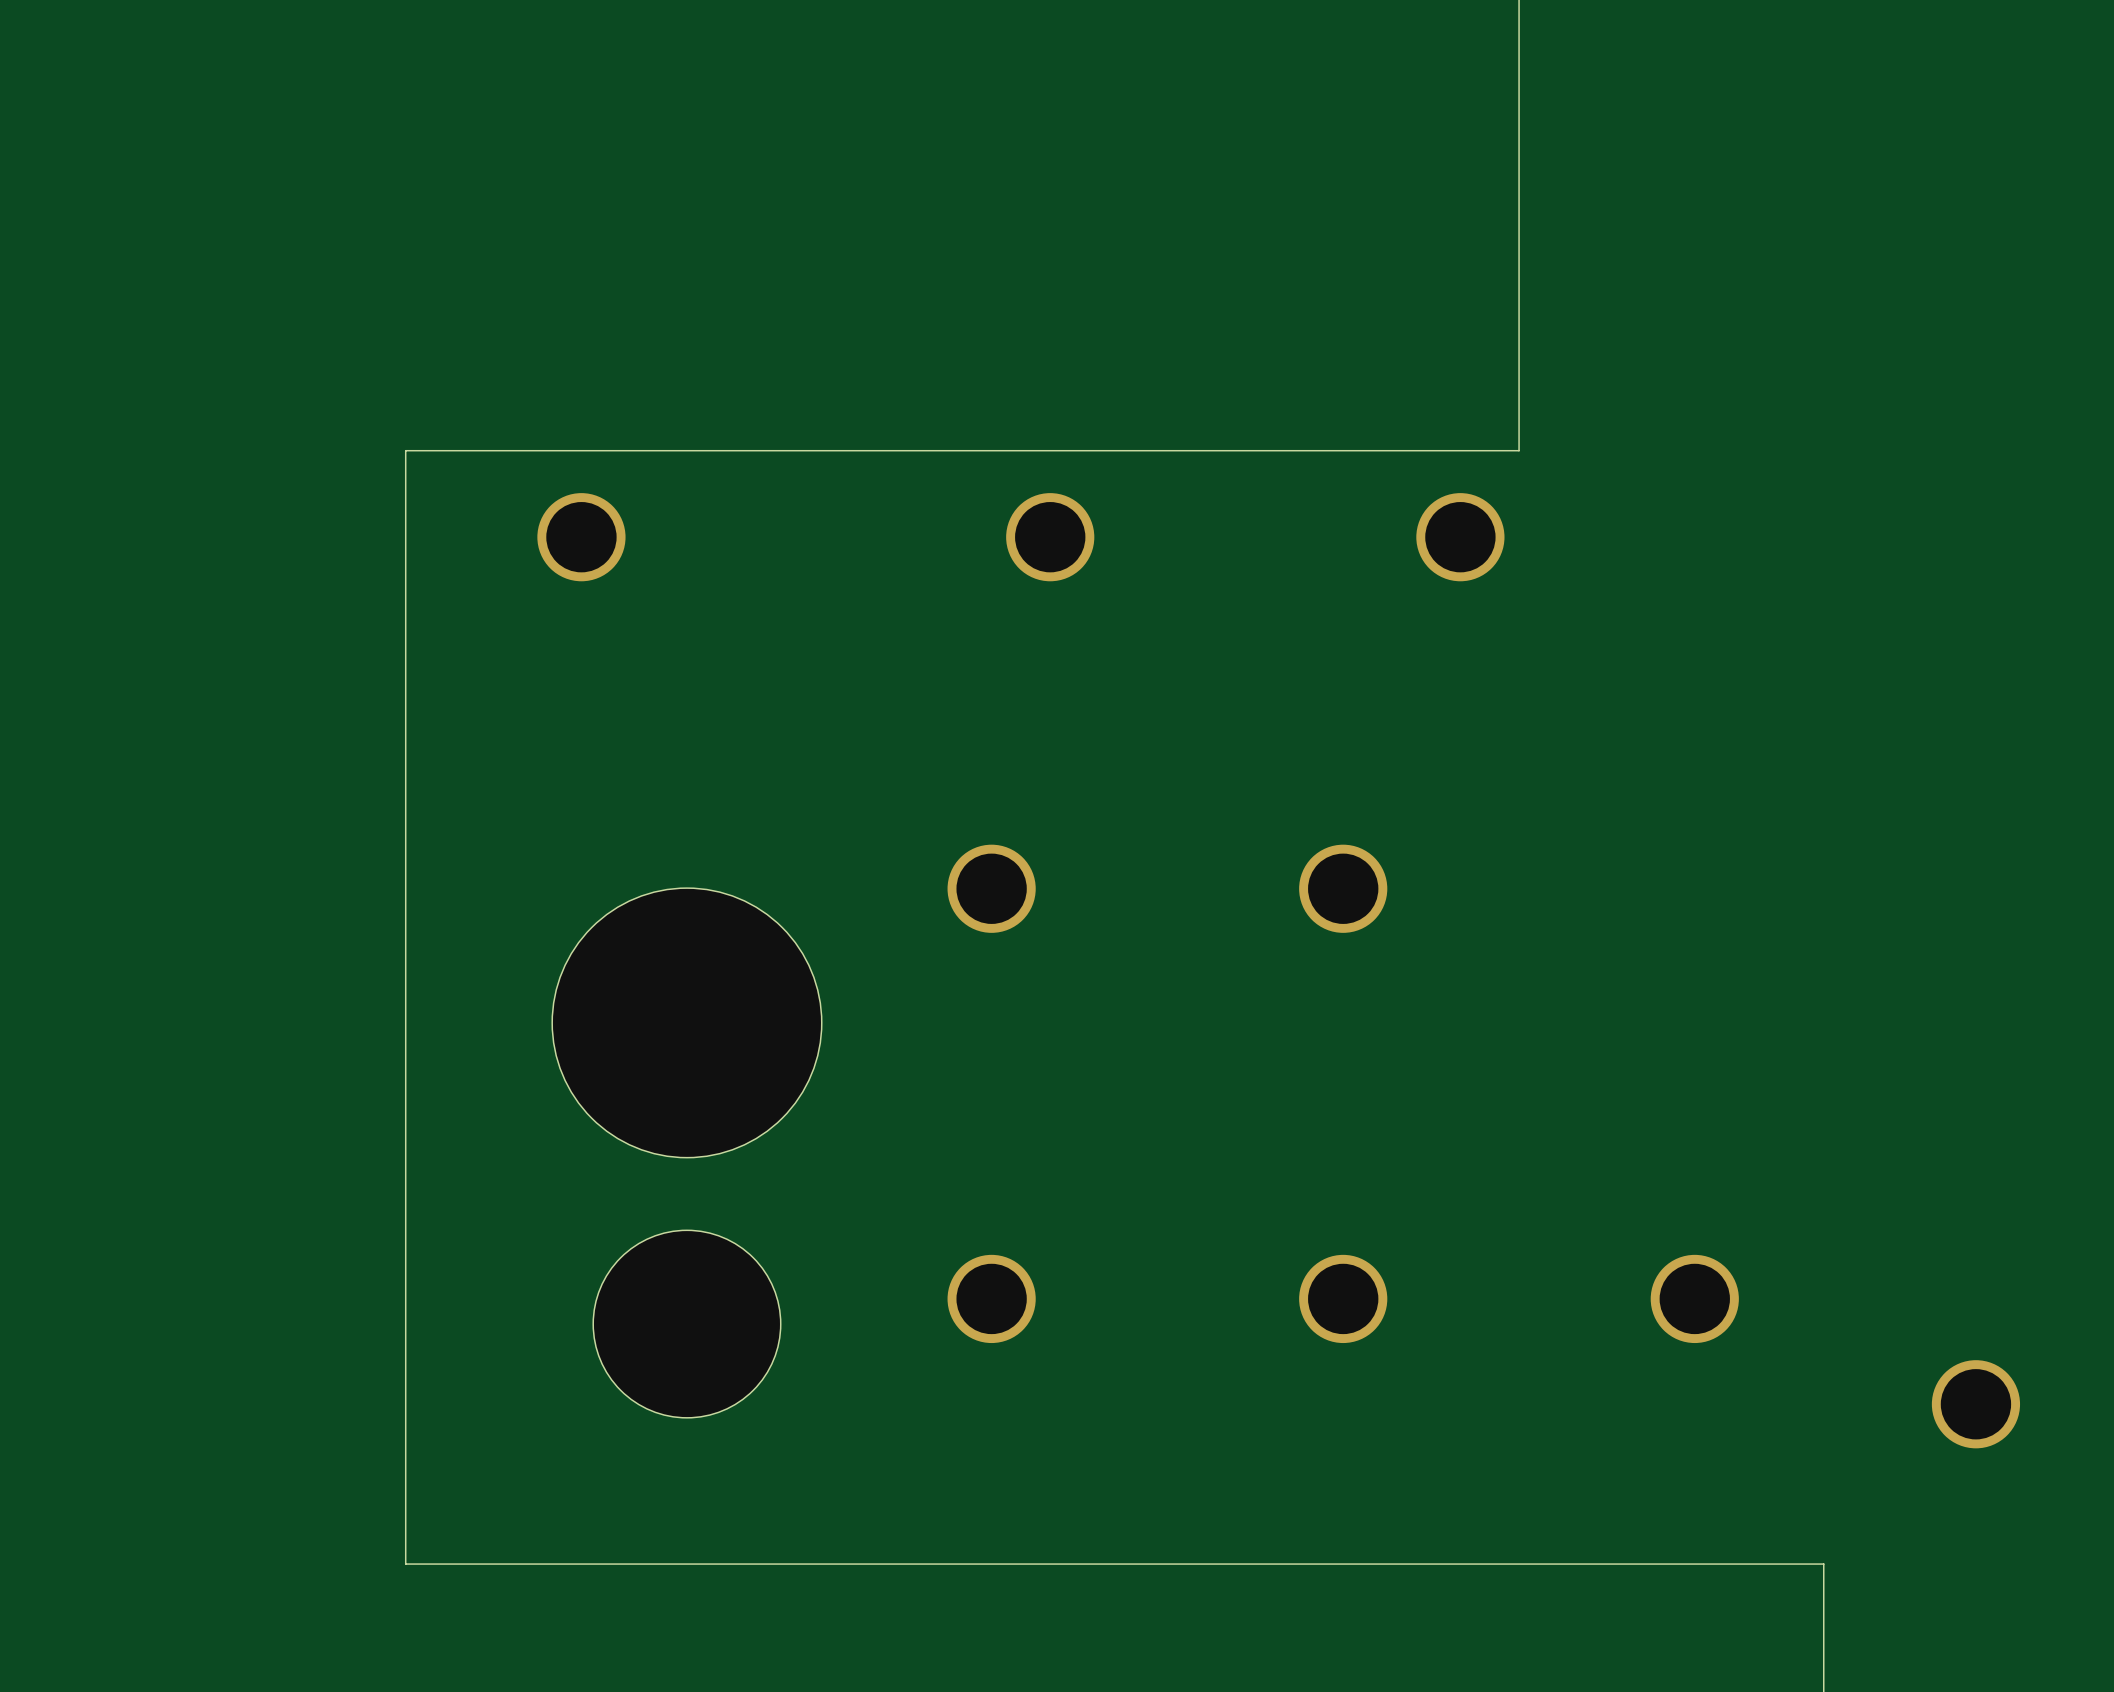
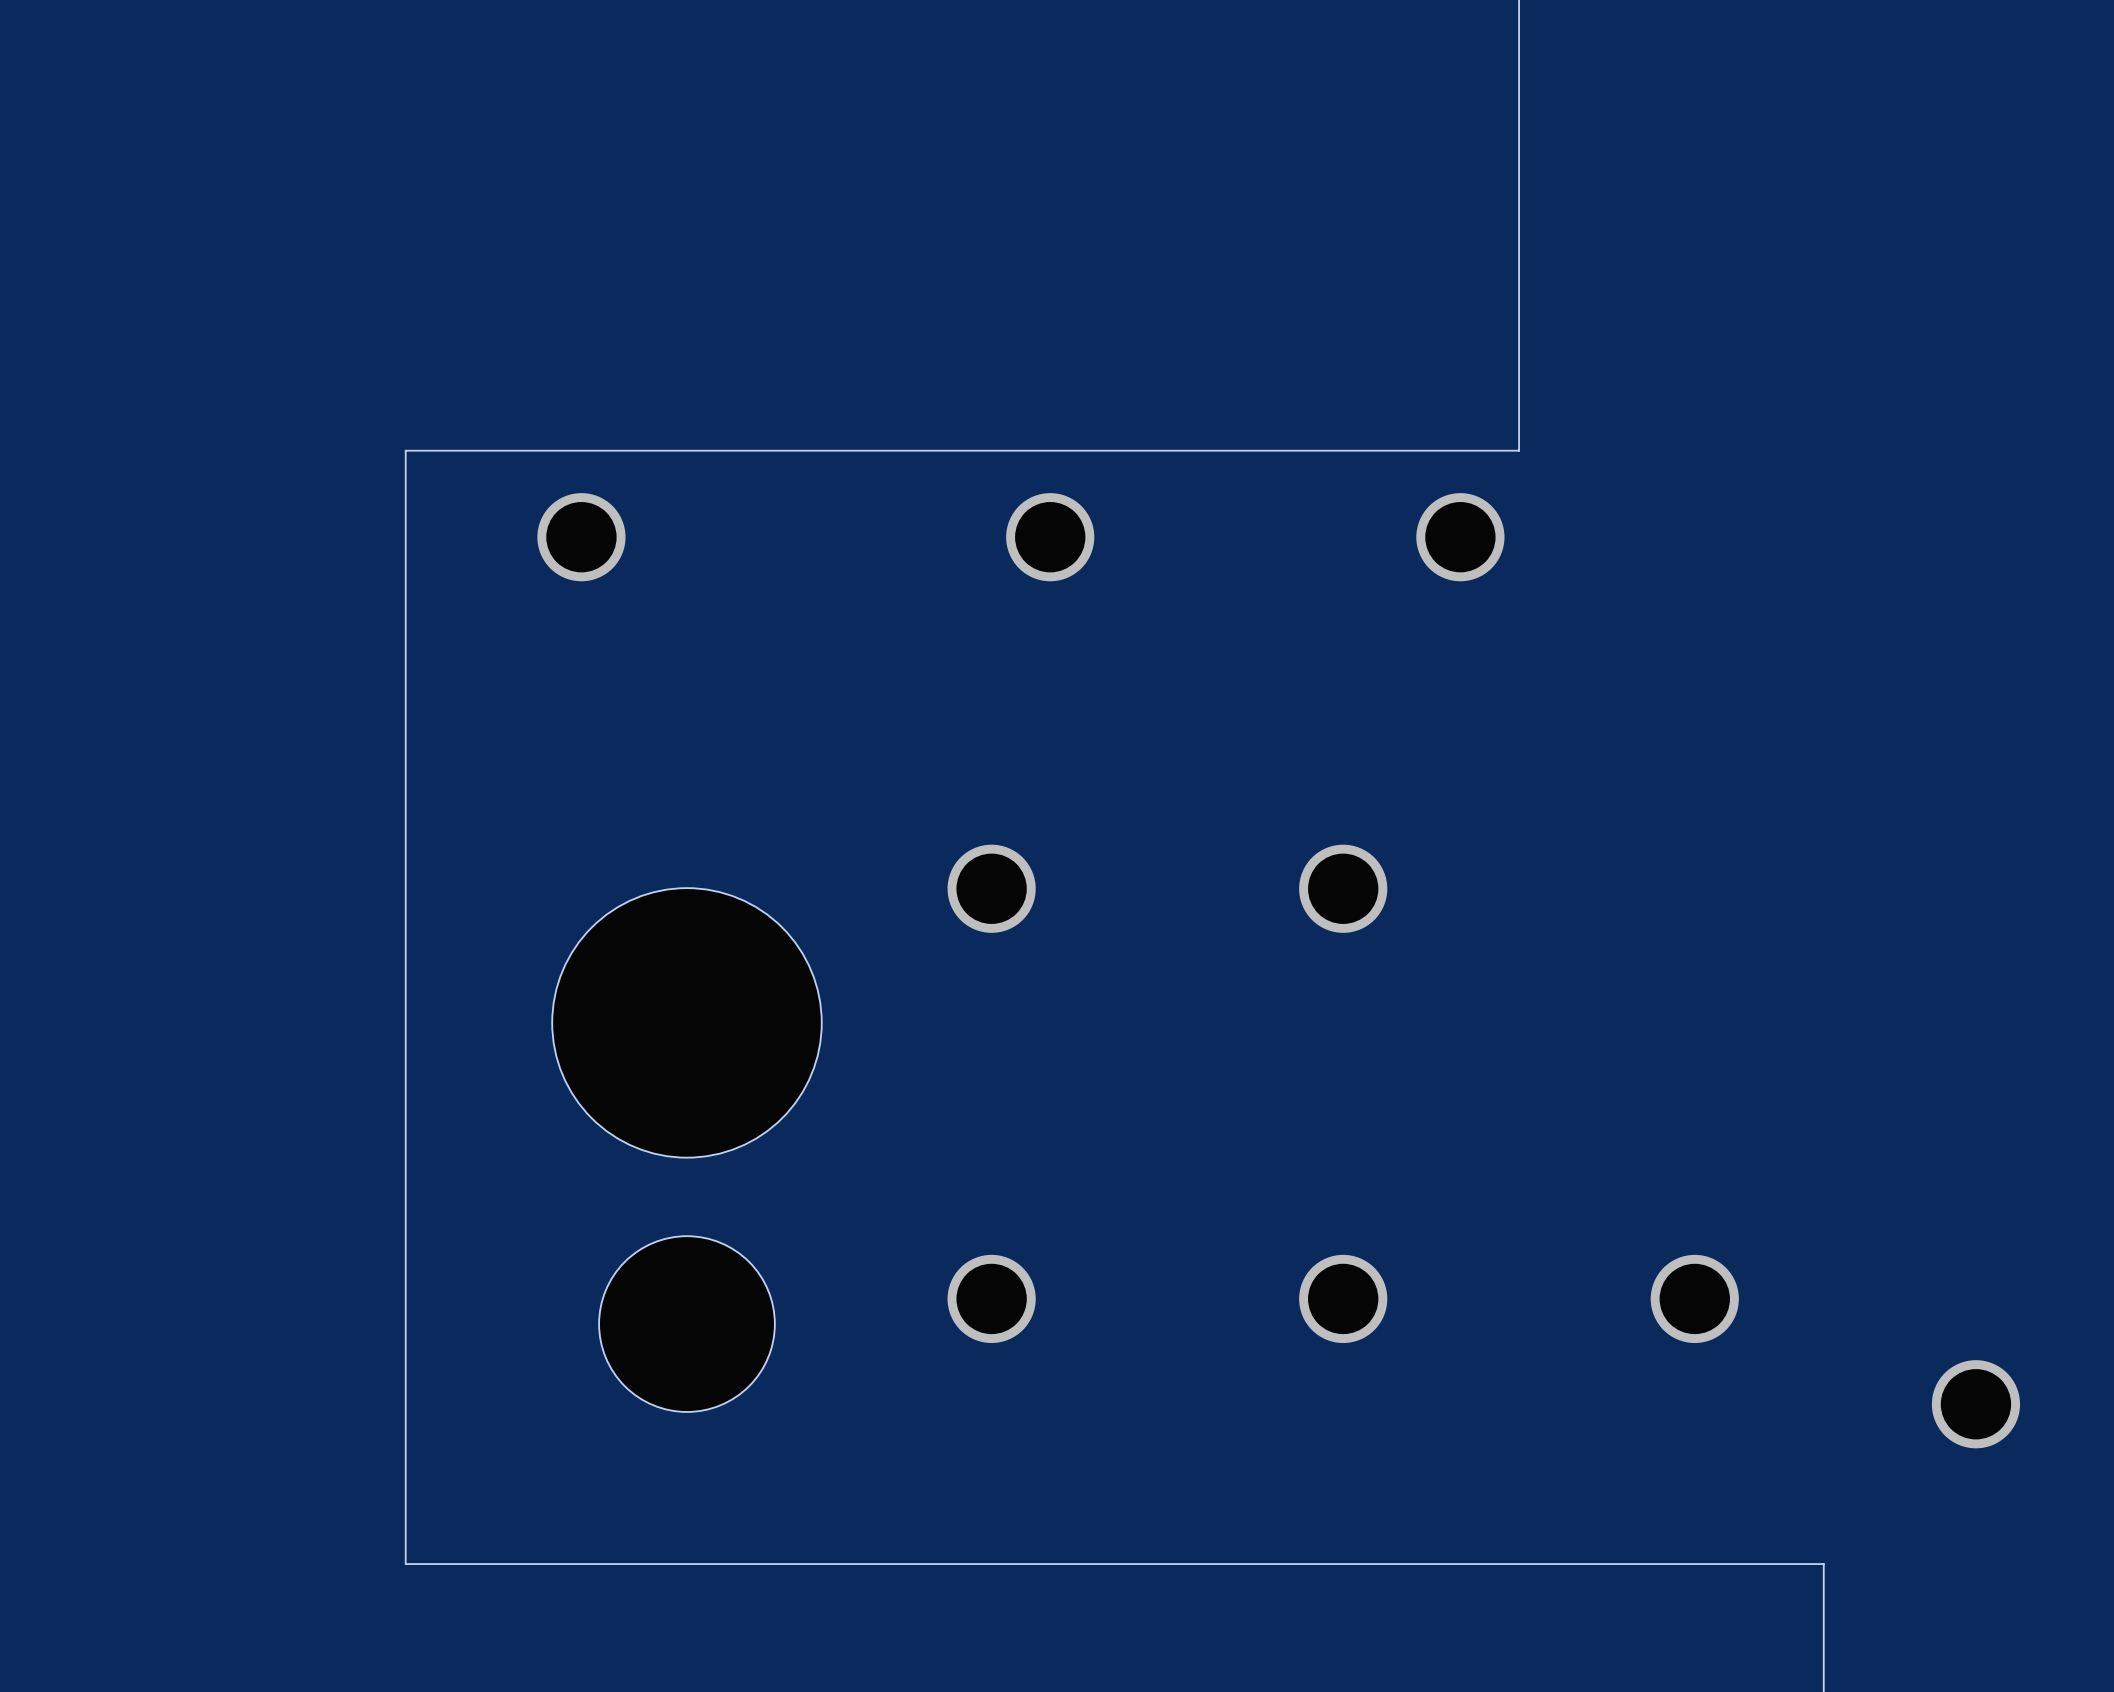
part footprint: [593, 1230, 781, 1418] -> [599, 1236, 775, 1412]

